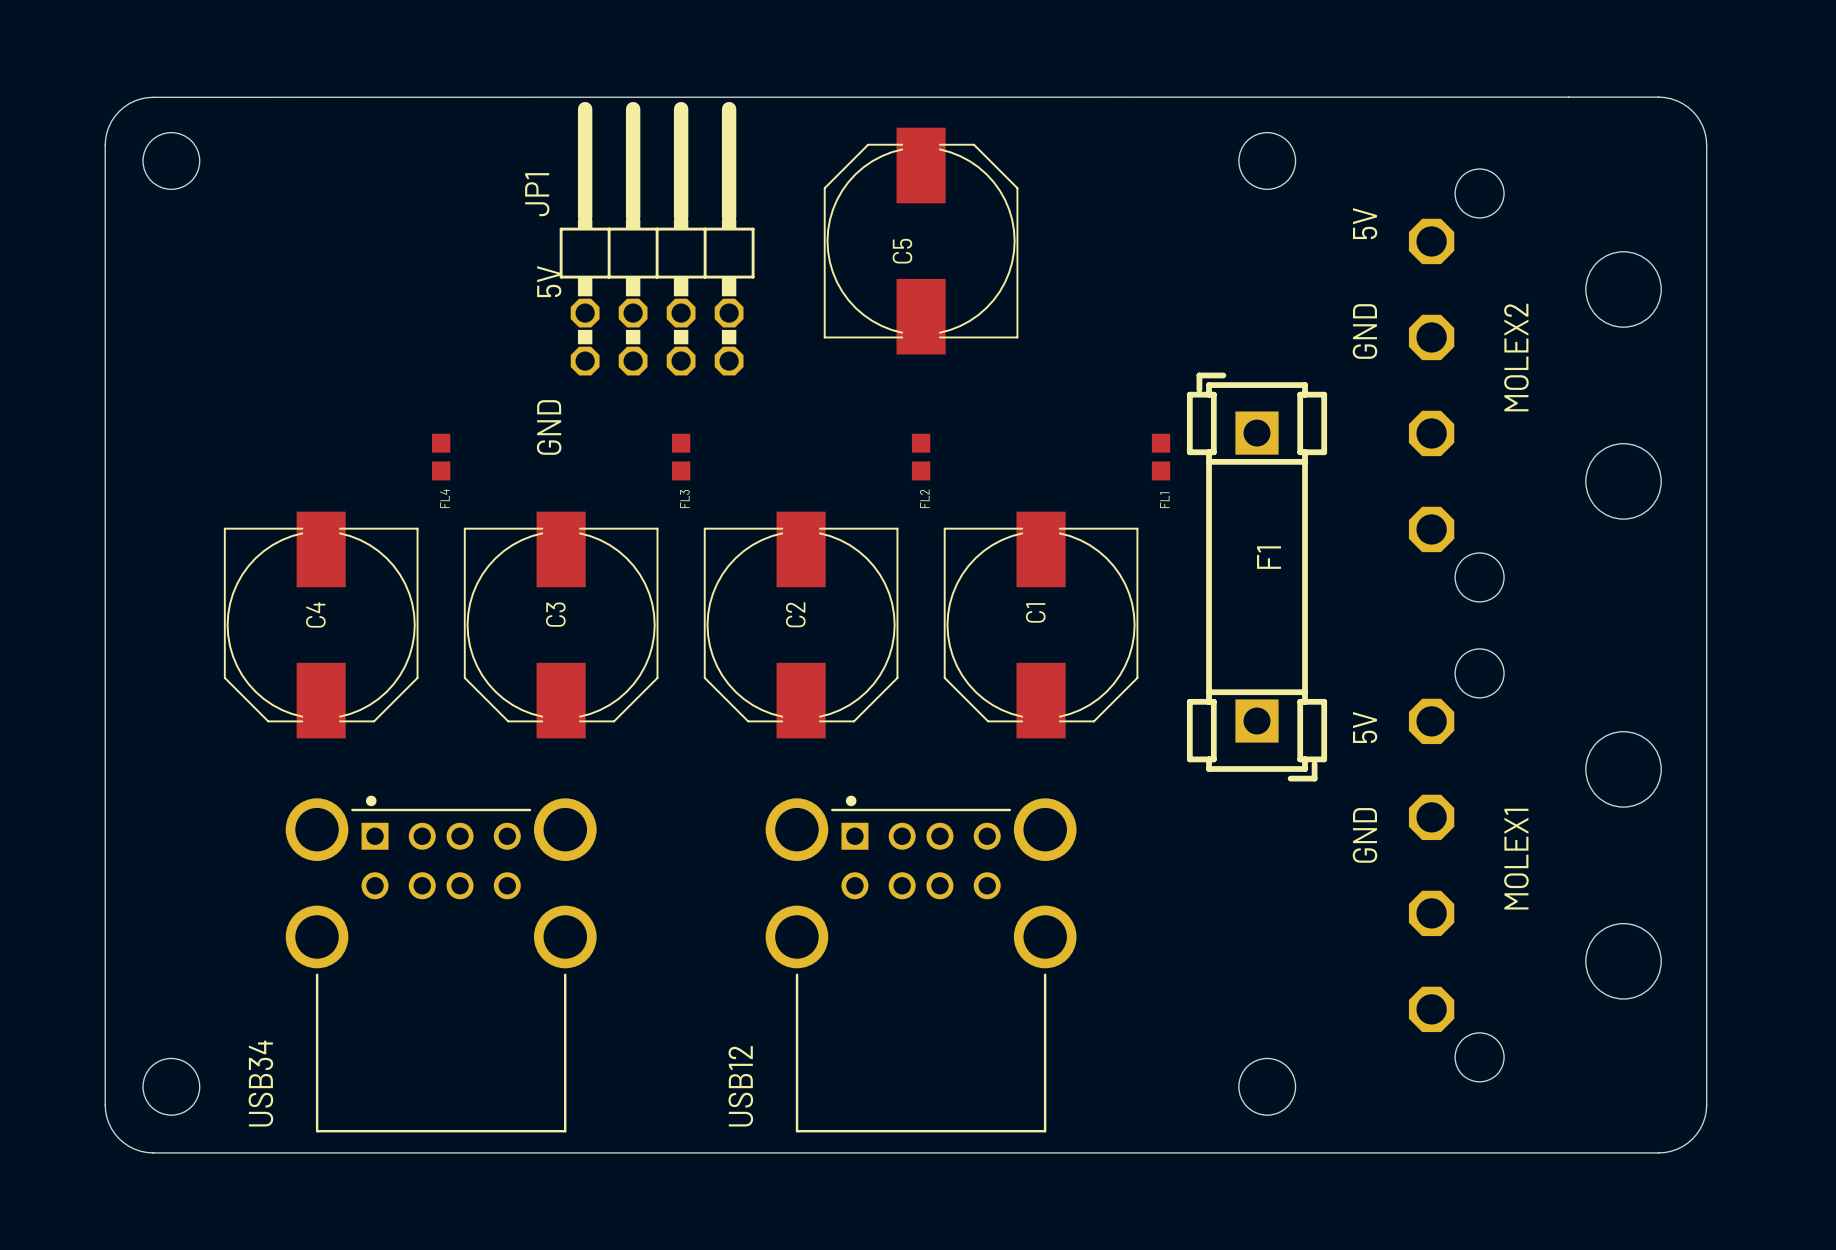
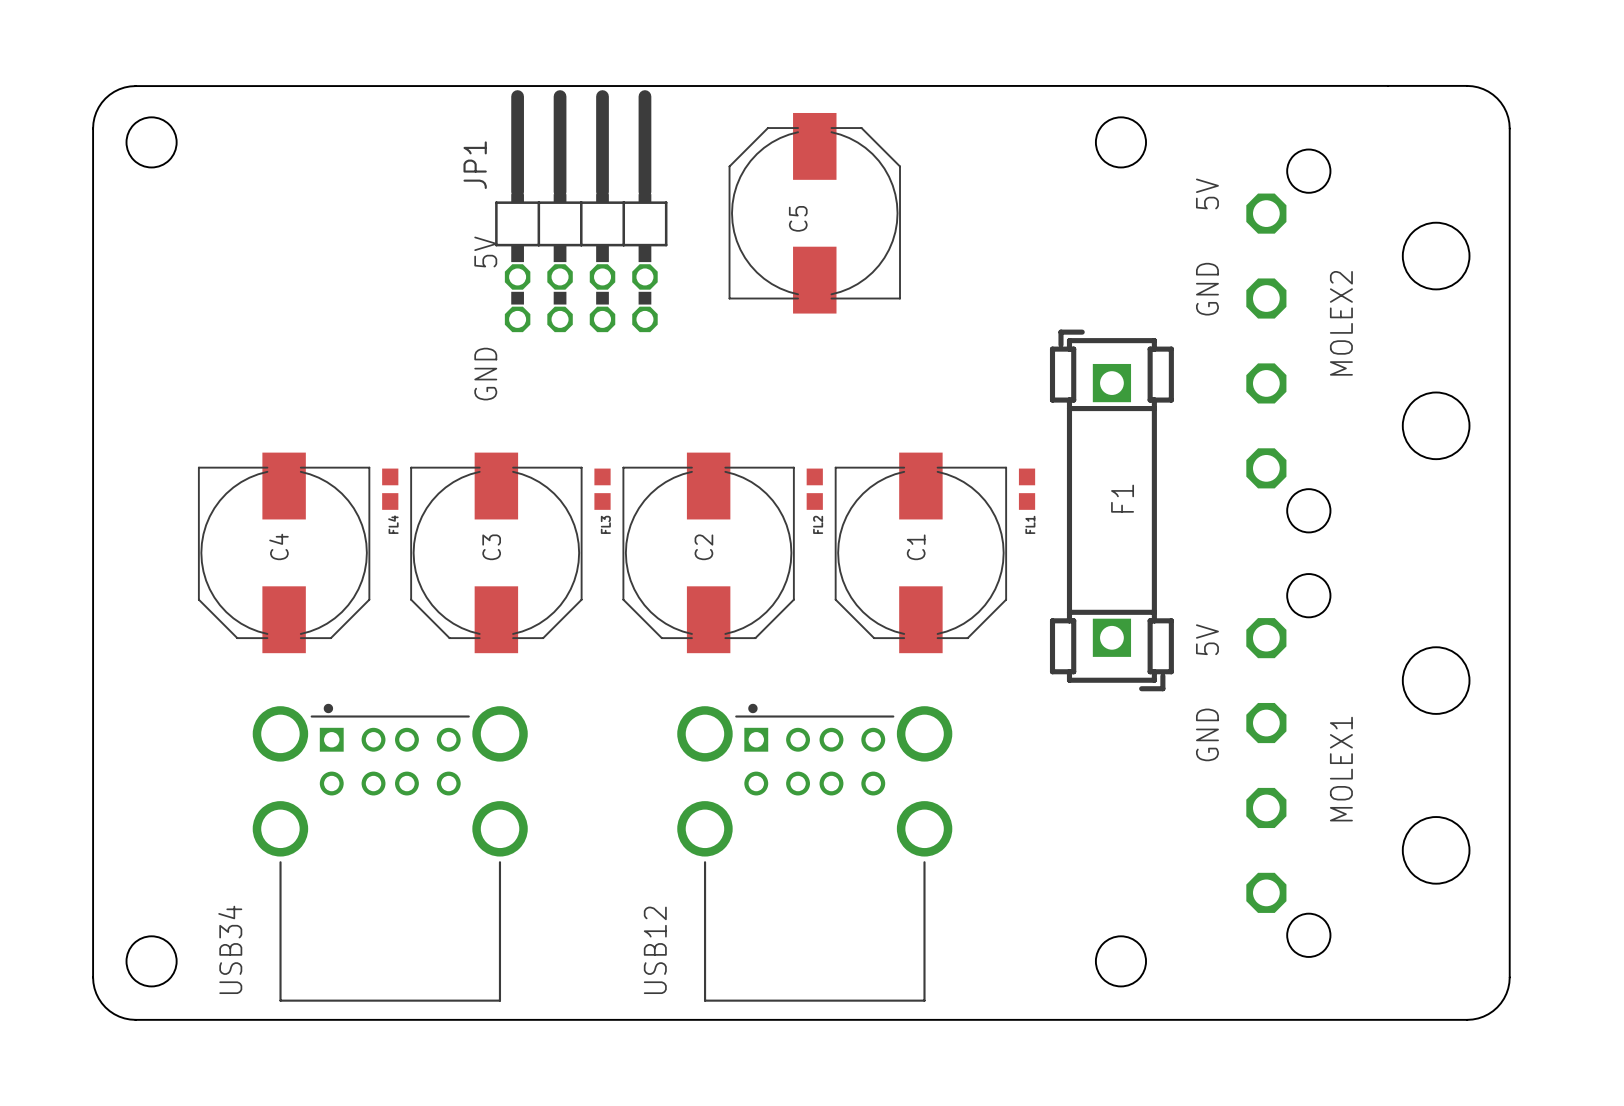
FL4 position: (441, 457) -> (390, 489)
FL3 position: (681, 457) -> (602, 489)
FL2 position: (921, 457) -> (814, 489)
FL1 position: (1161, 457) -> (1027, 489)

